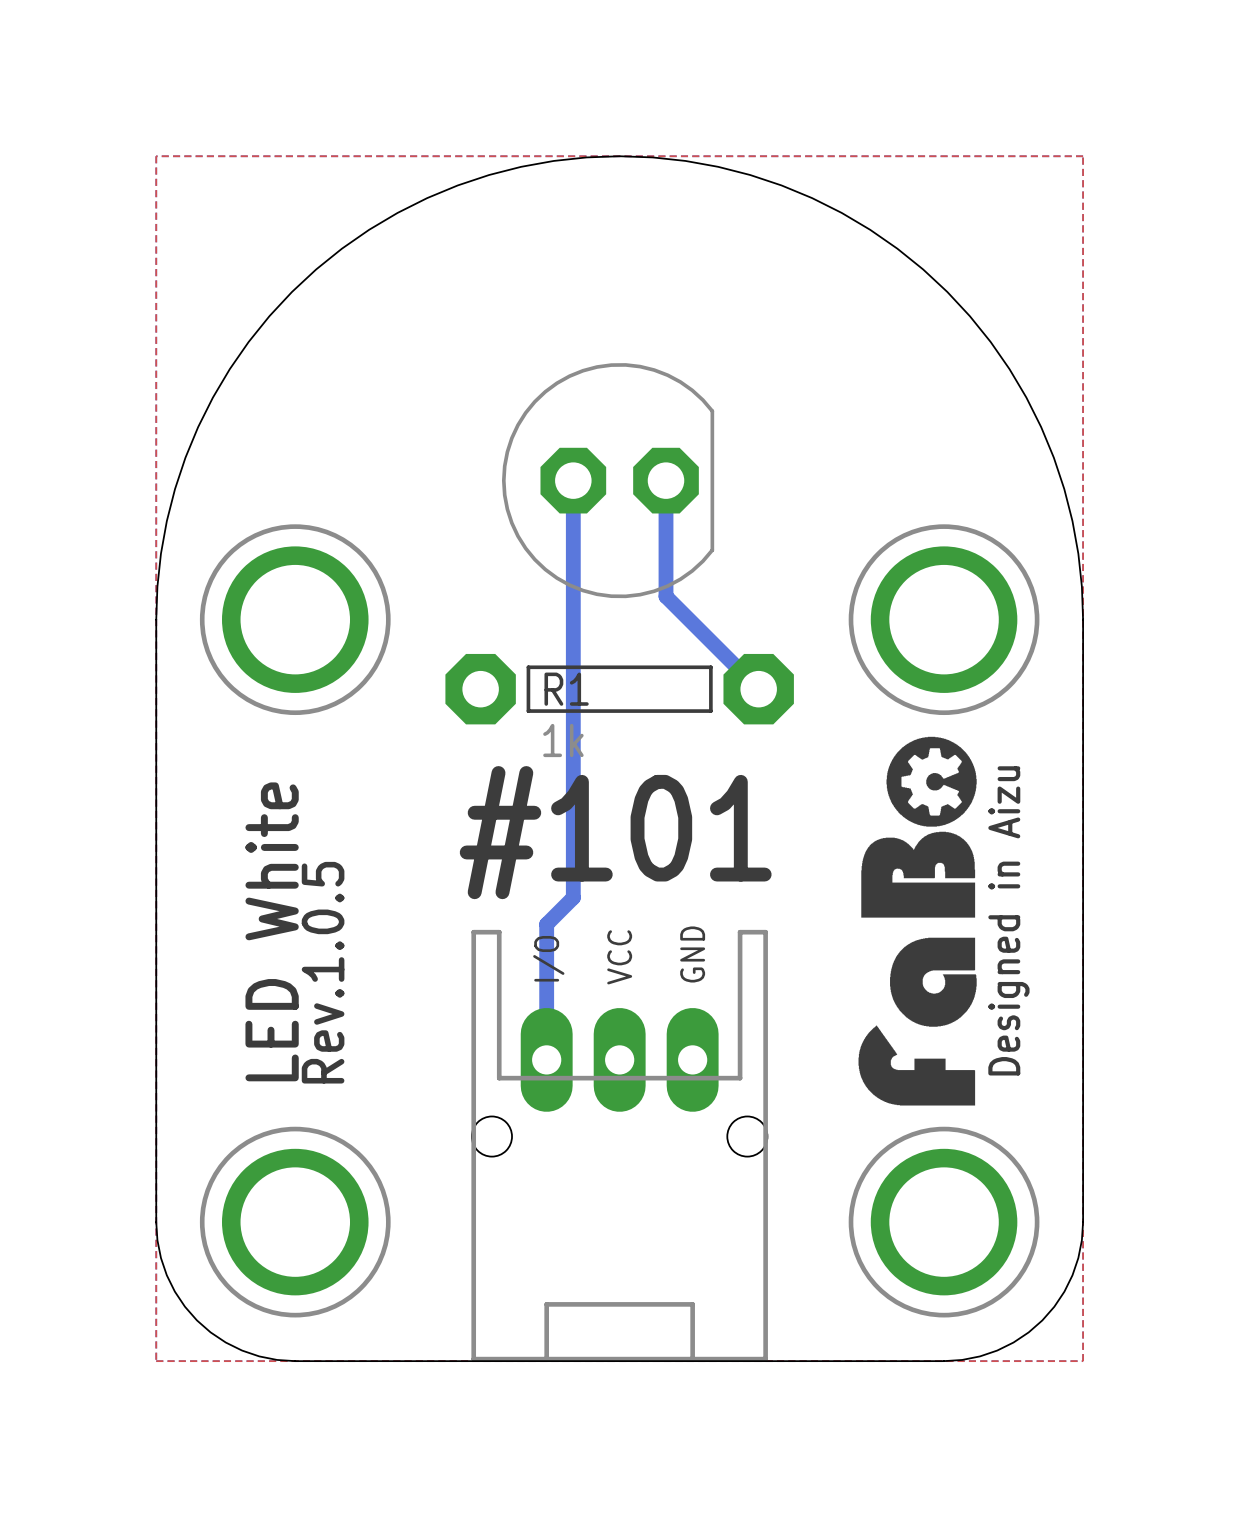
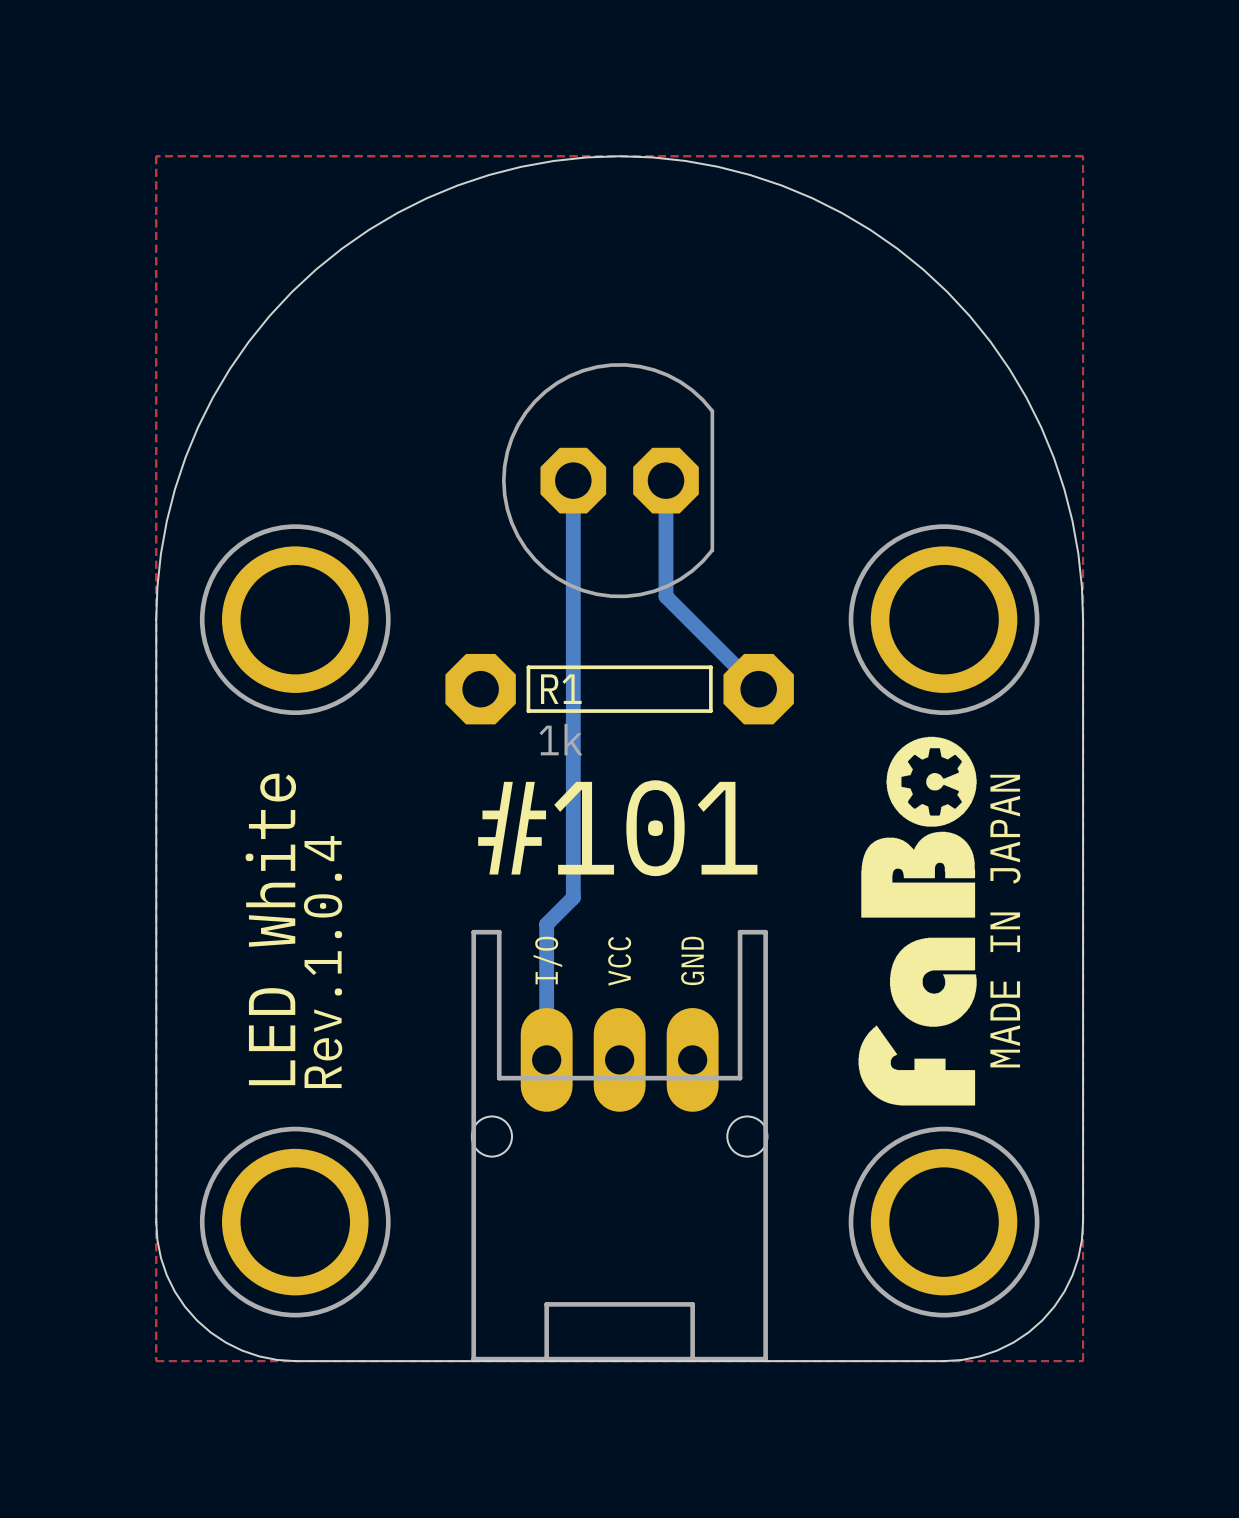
text: Designed in Aizu (1008, 920) -> MADE IN JAPAN (1005, 921)
text: Rev.1.0.5 (323, 972) -> Rev.1.0.4 (323, 962)

